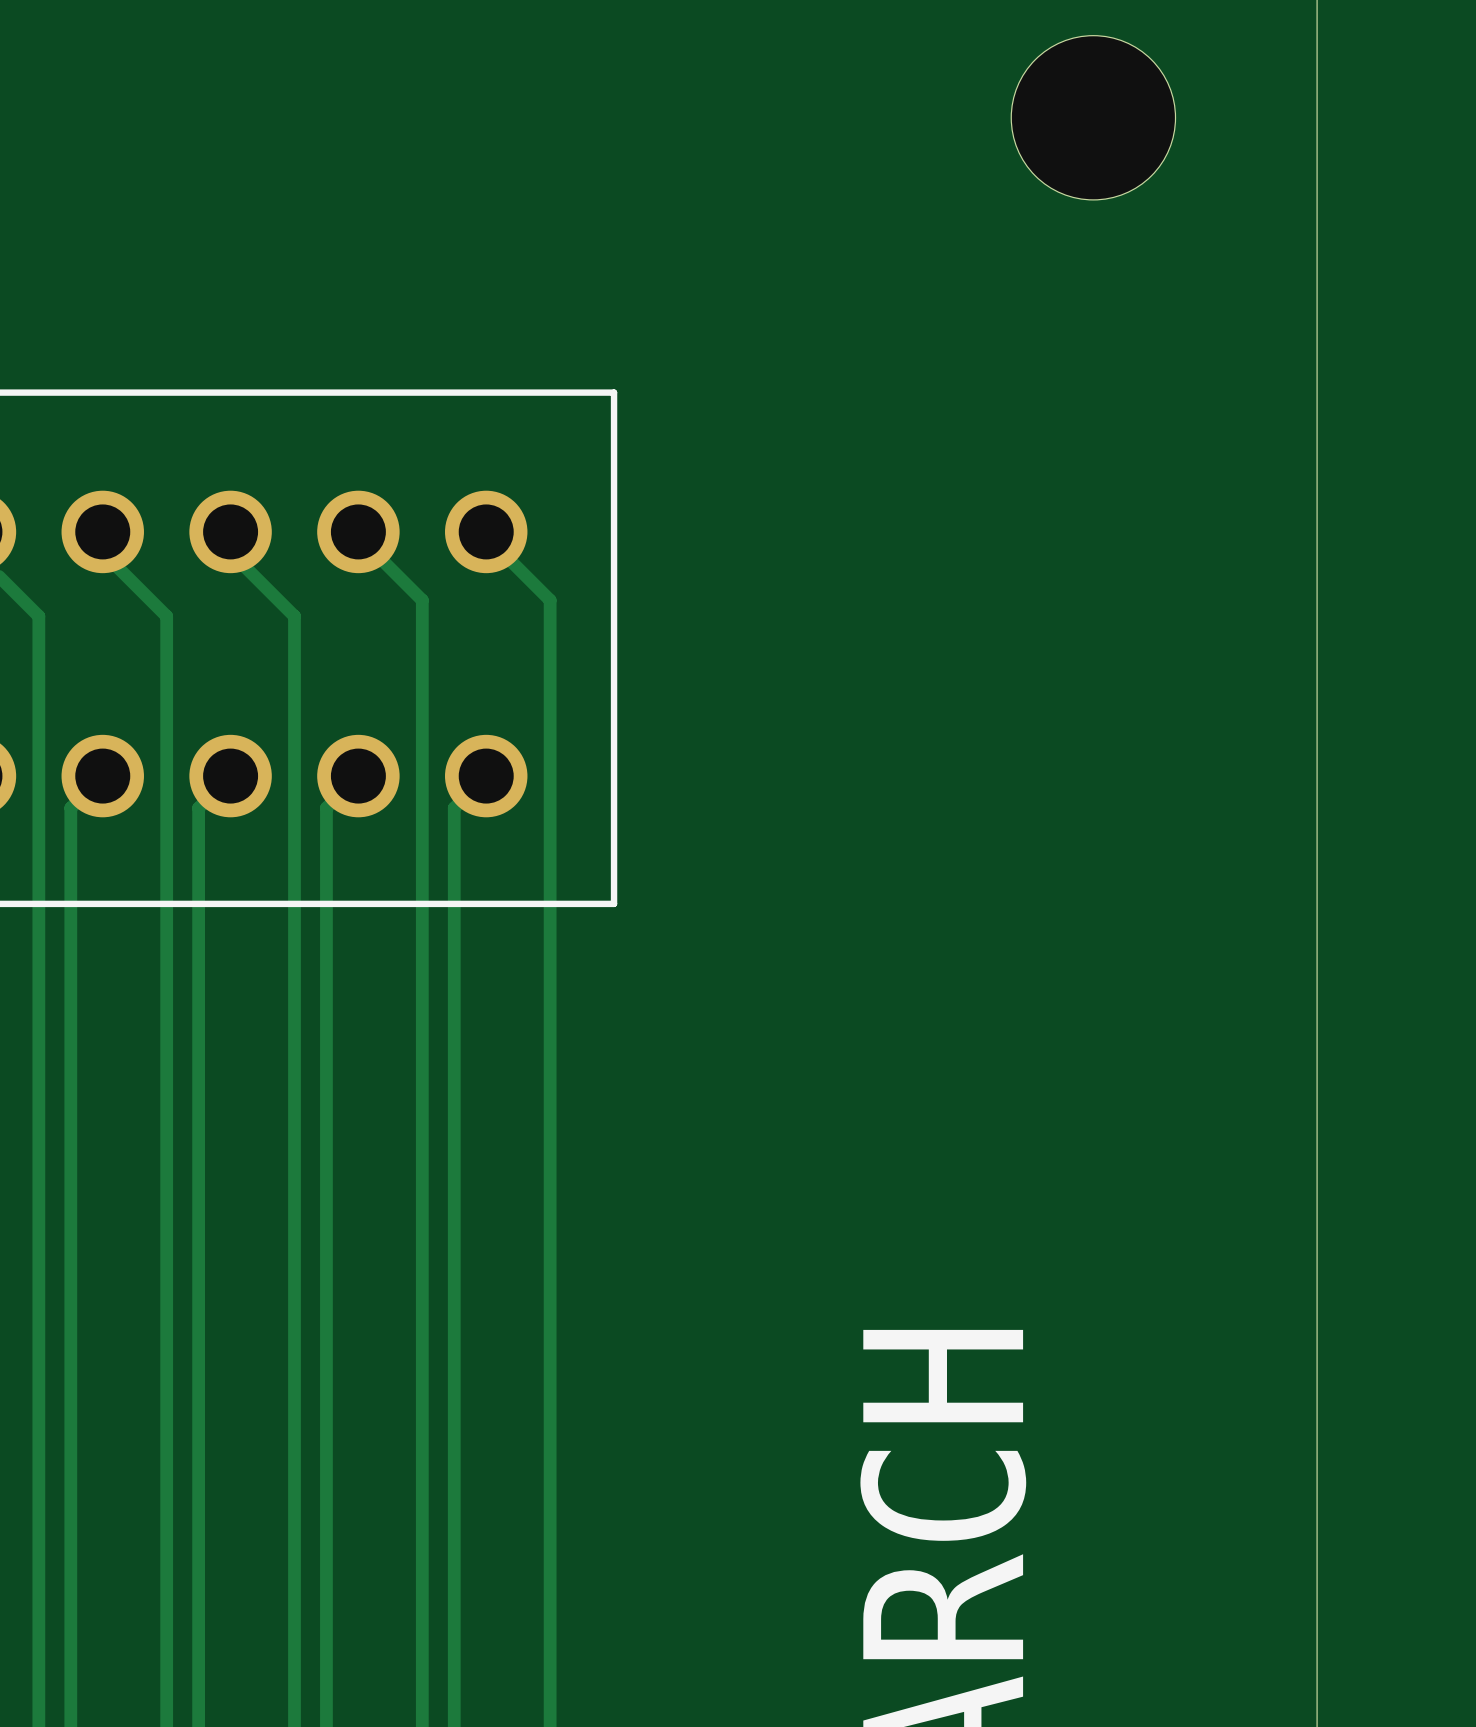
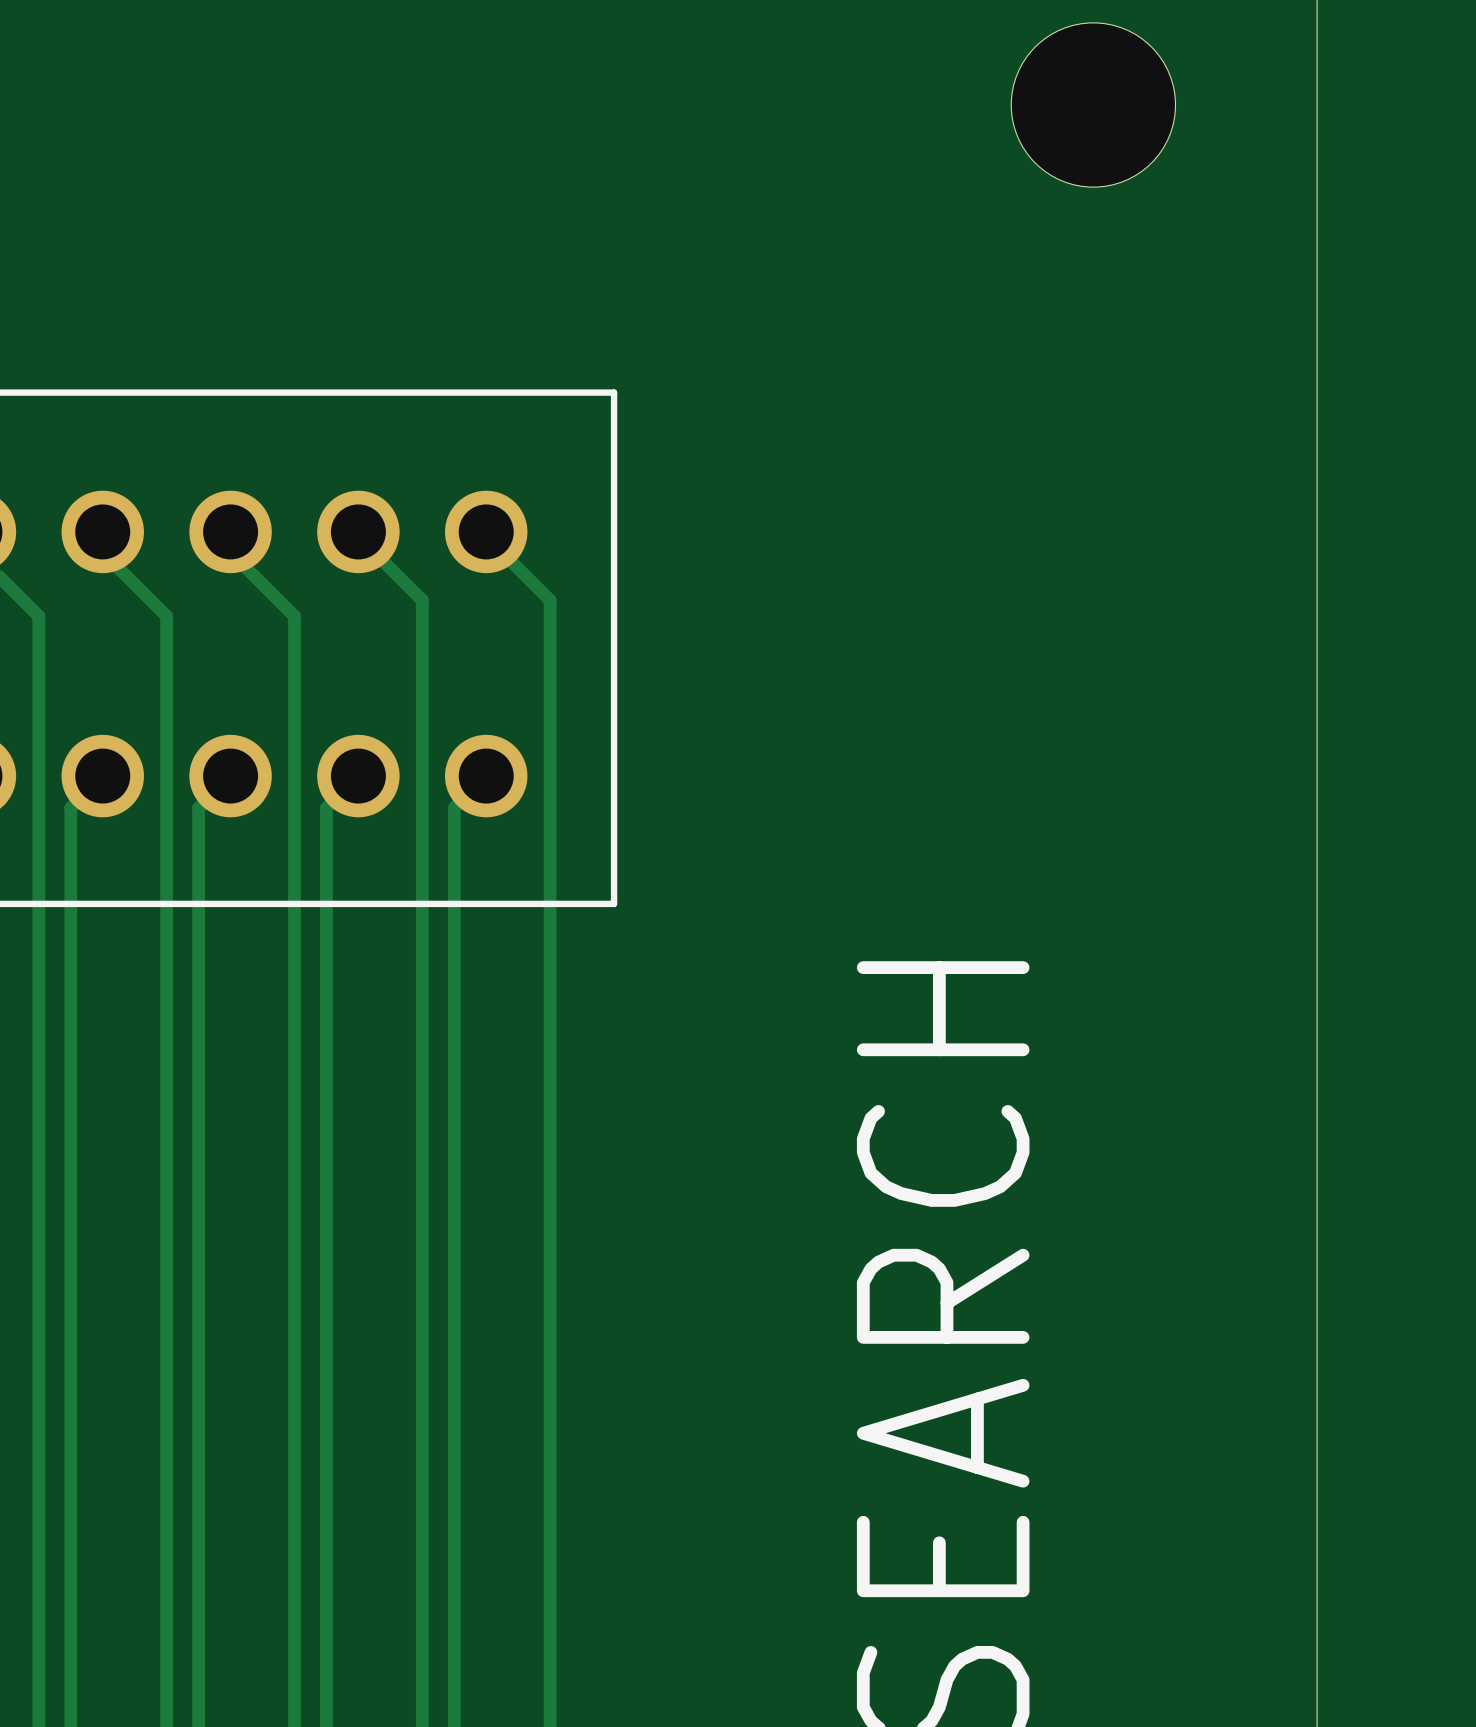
hole position: (1093, 117) -> (1093, 105)

